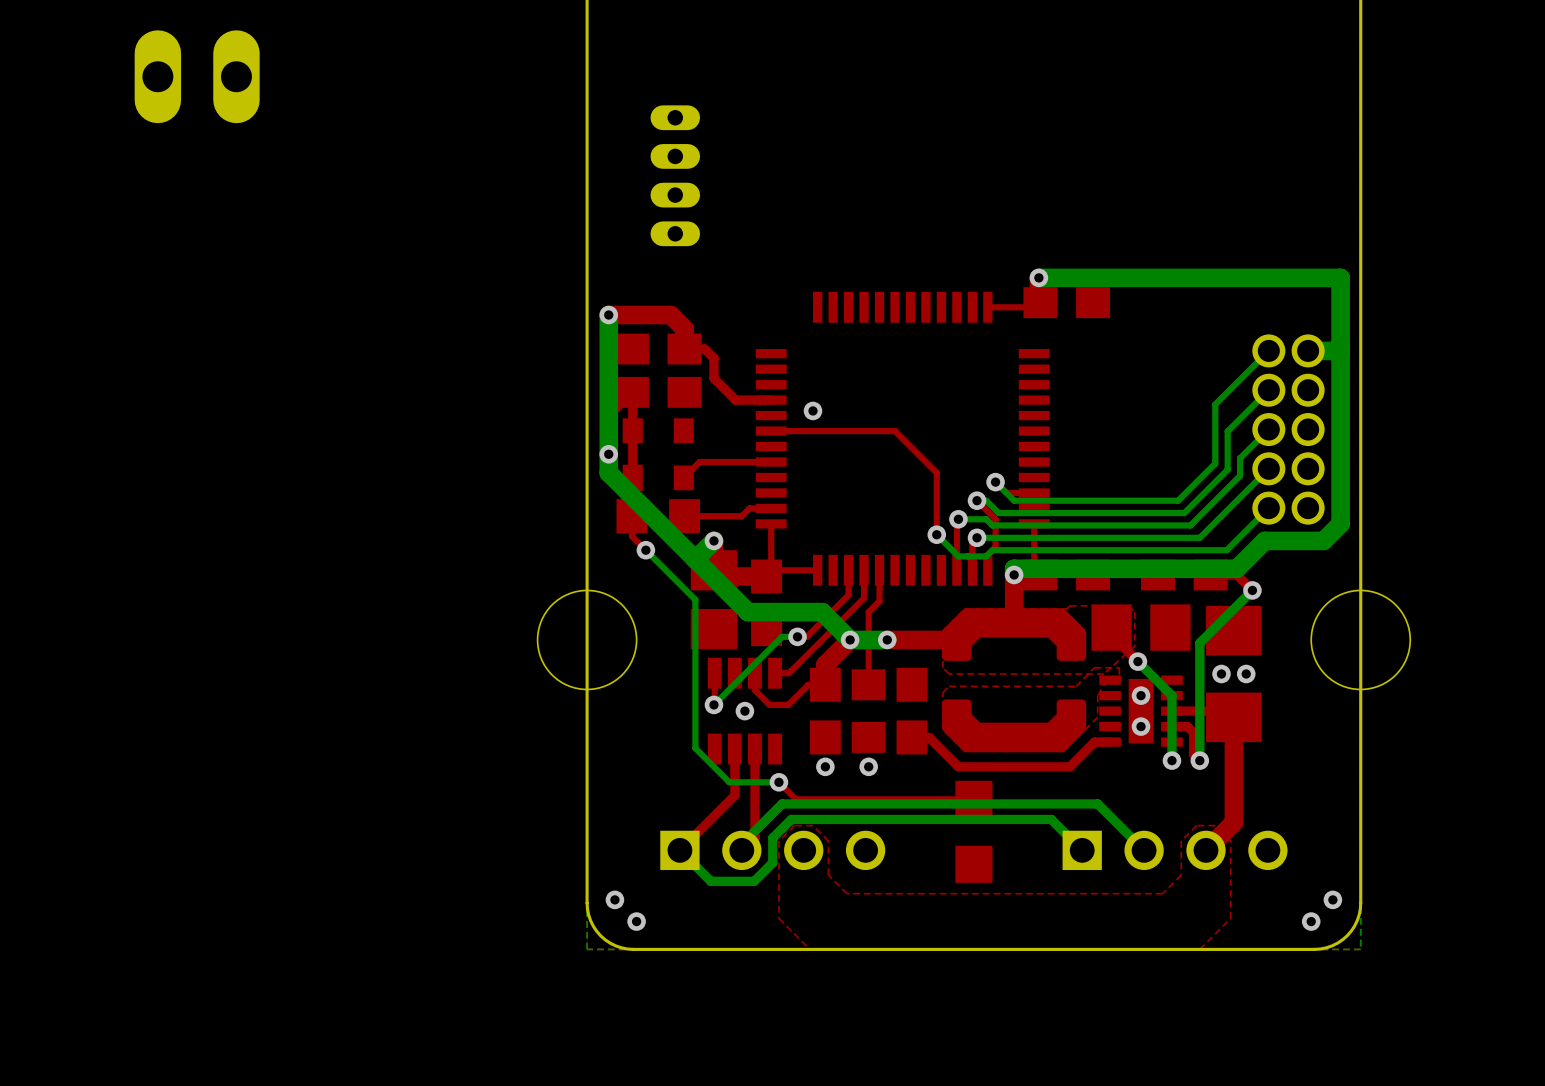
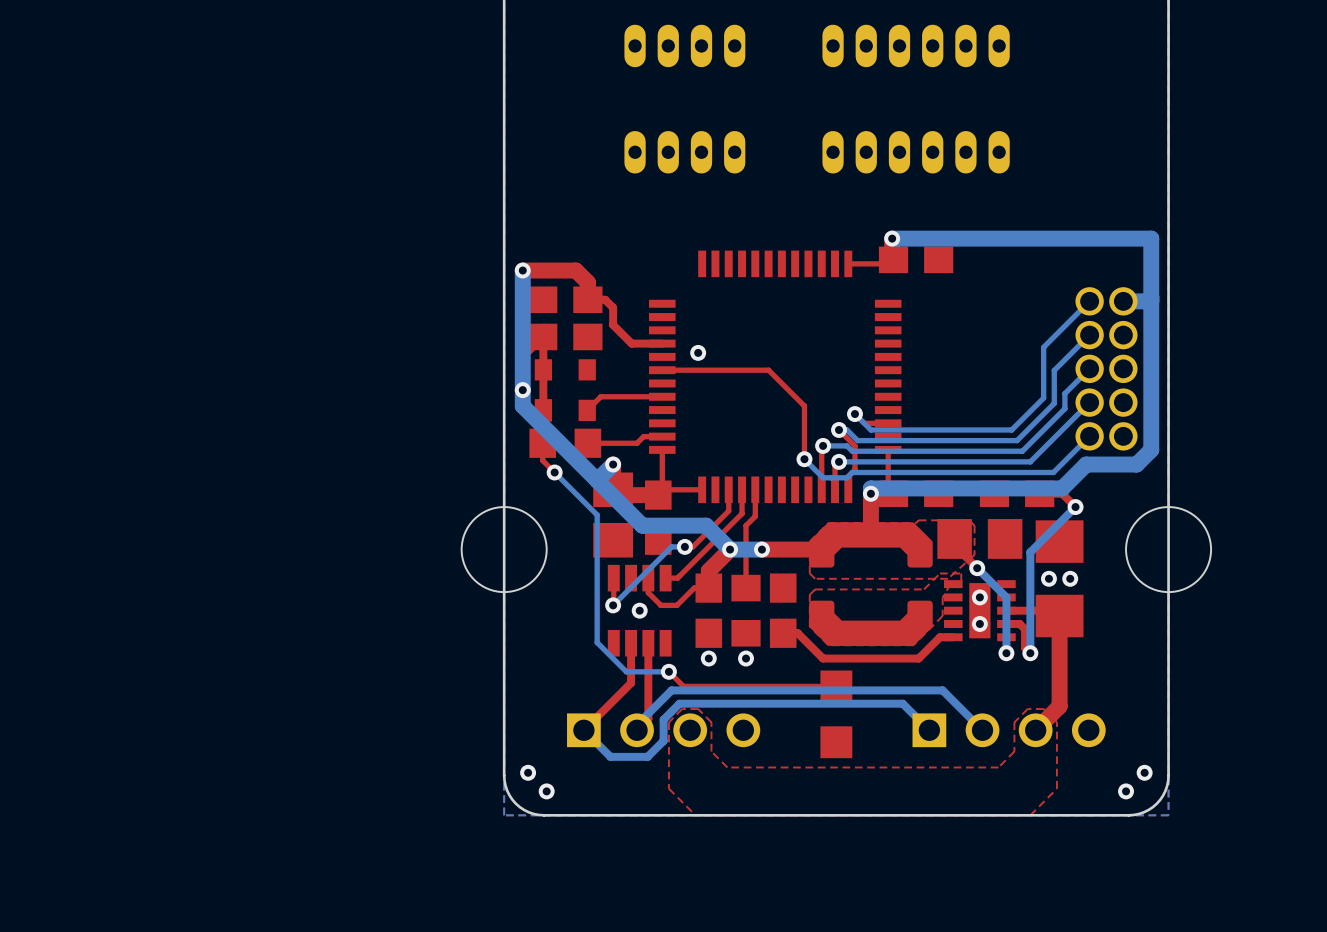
part: none -> (684, 45)
part: none -> (916, 45)
part: (197, 76) -> none
part: (675, 175) -> none
part: none -> (684, 152)
part: none -> (916, 152)

